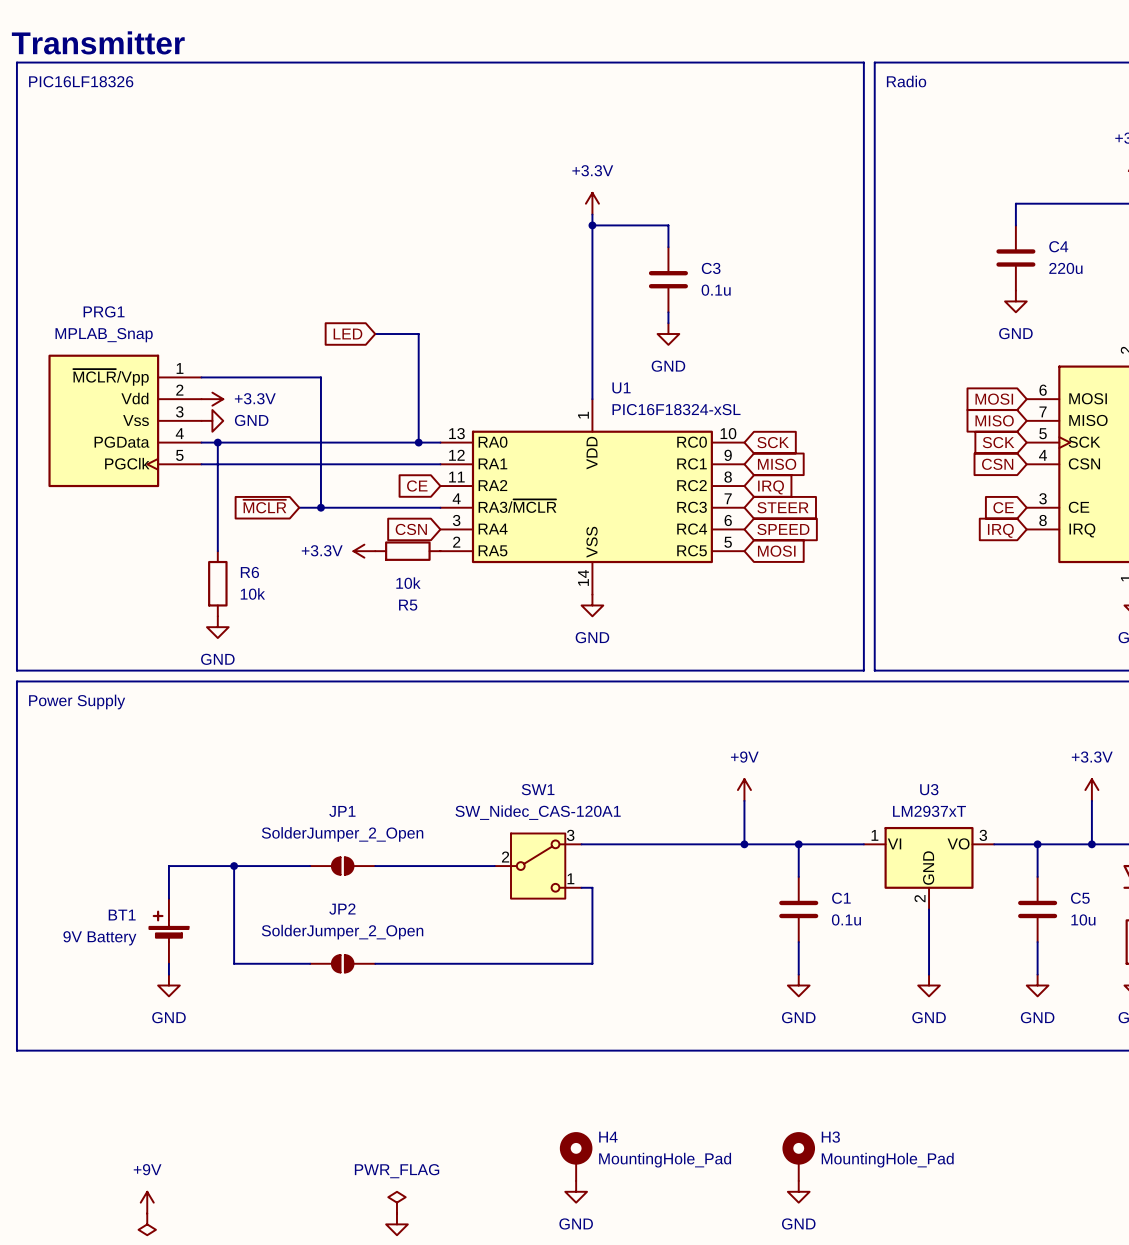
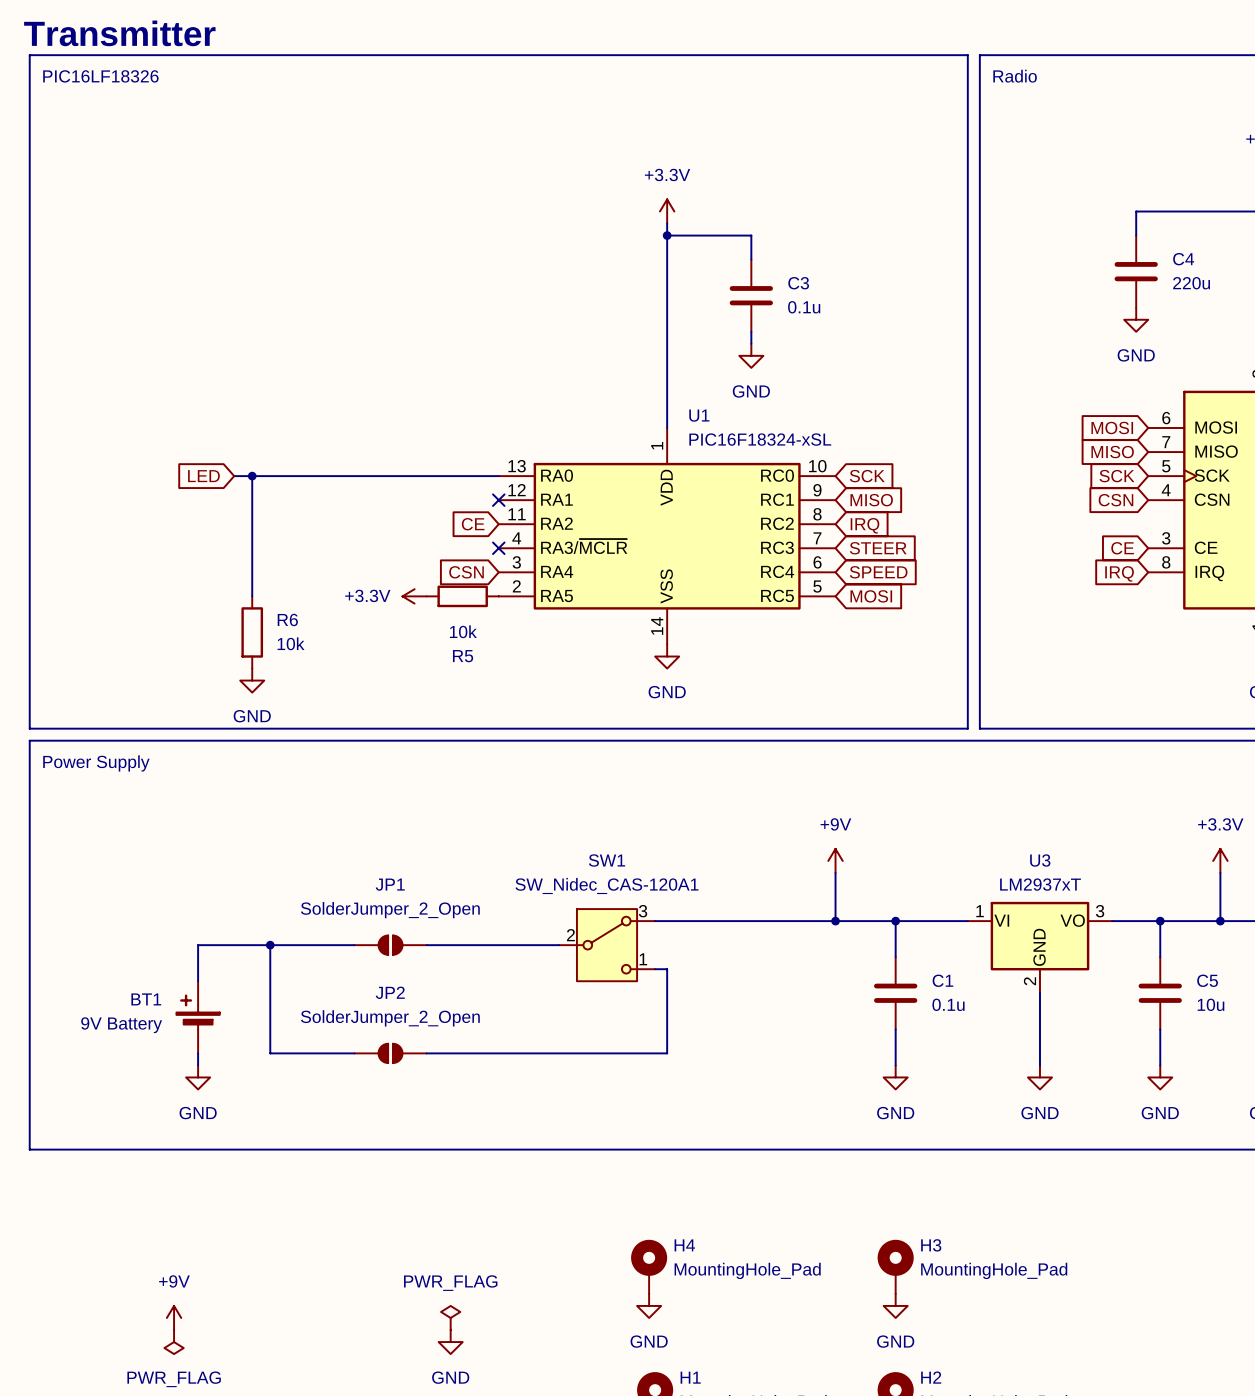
global label position: LED (347, 334) -> LED (203, 476)
wire: (375, 334) (418, 334) (418, 442) -> none
wire: (201, 377) (320, 377) (320, 507) -> none
power symbol: +3.3V (212, 399) -> none
PRG1: MPLAB_Snap (124, 420) -> none
power symbol: GND (212, 420) -> none
junction: (418, 442) -> none
wire: (201, 464) (440, 464) -> none
no-connect mark: none -> (498, 500)
global label: ~{MCLR} (264, 506) -> none
wire: (299, 507) (440, 507) -> none
junction: (320, 507) -> none
no-connect mark: none -> (498, 548)

